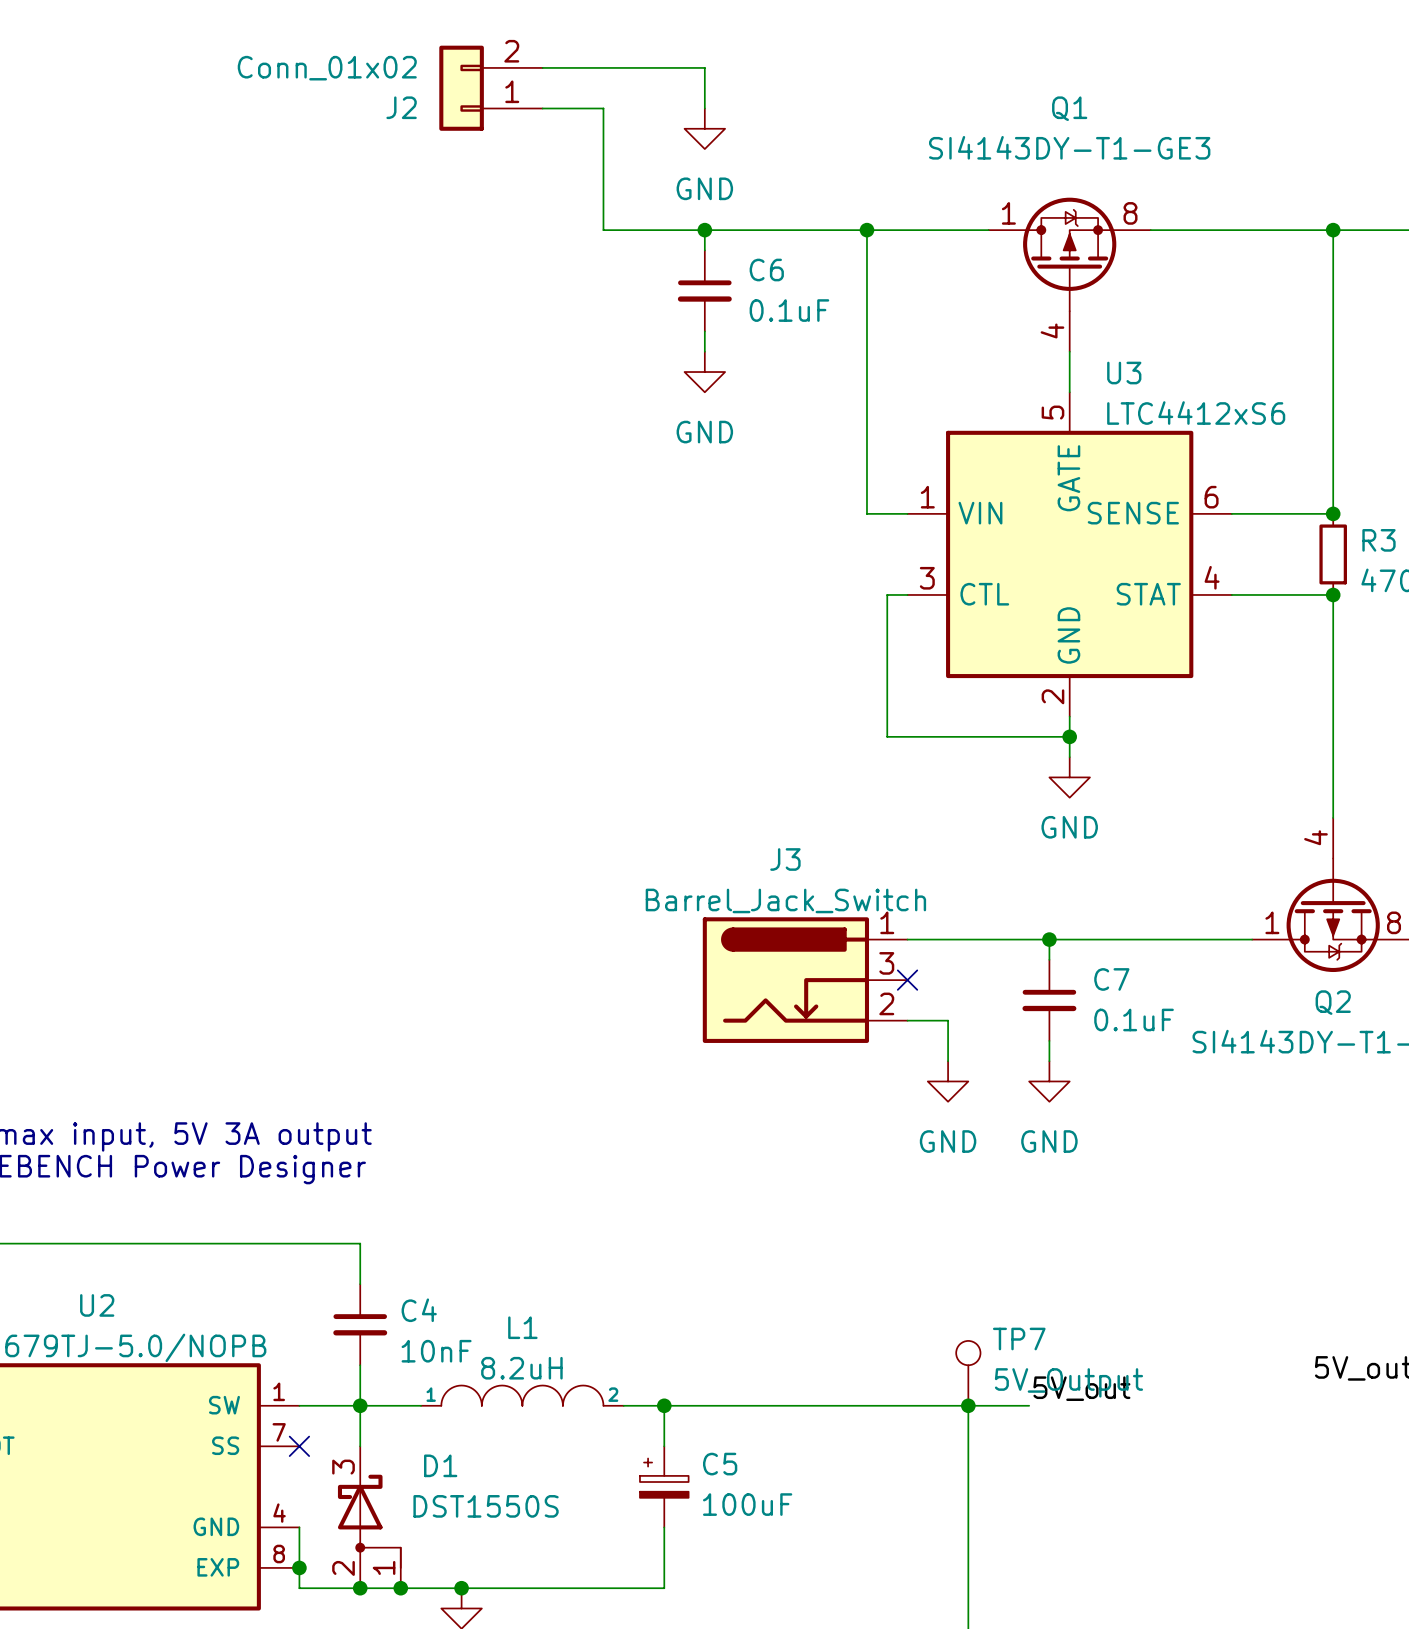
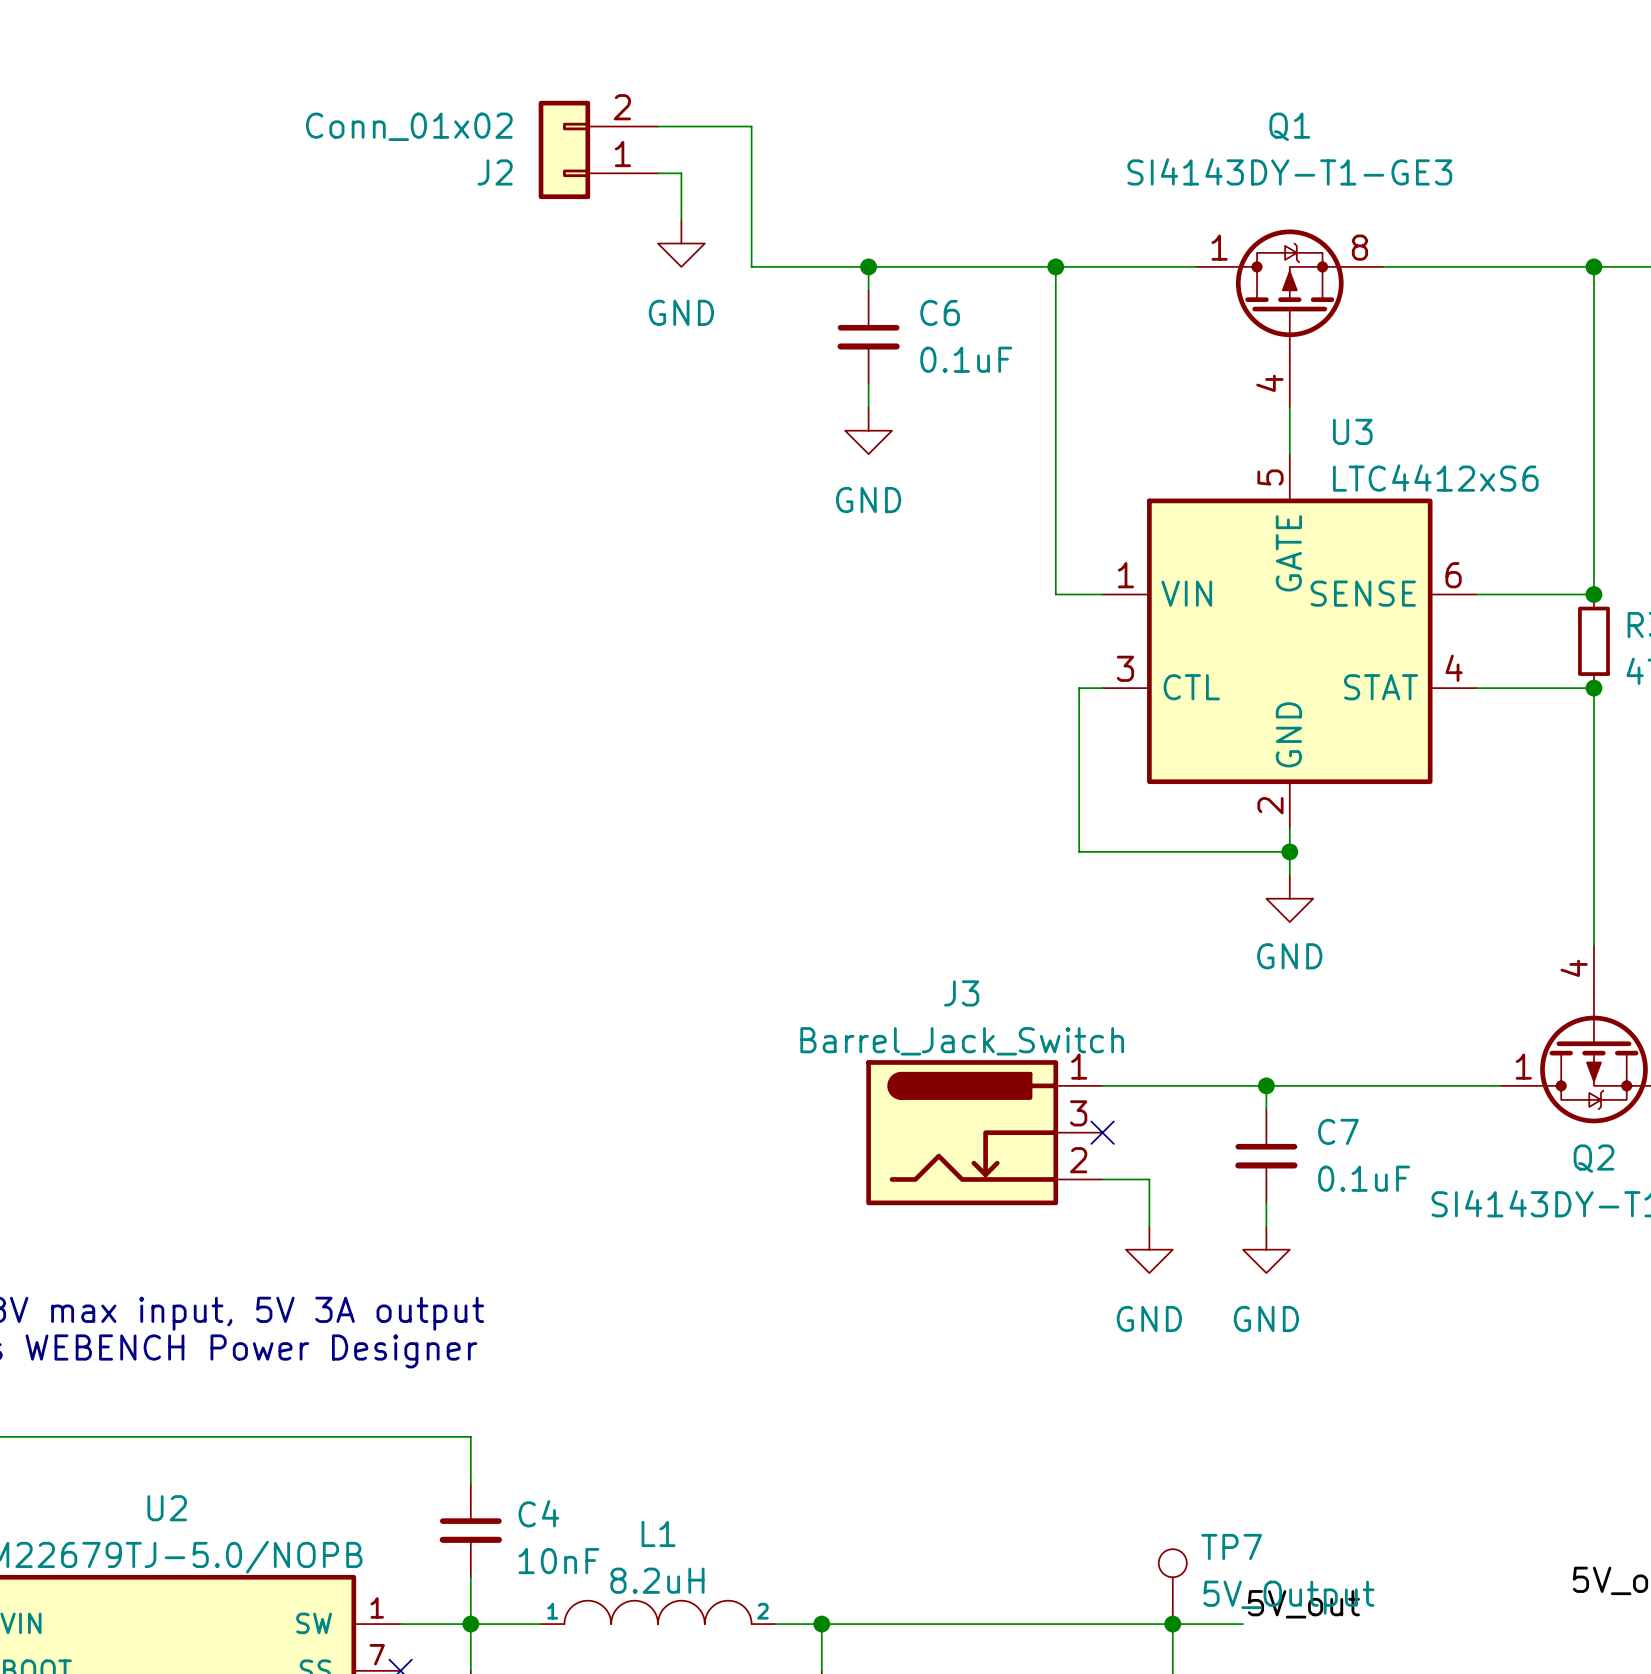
wire: (542, 67) (704, 67) (704, 108) -> none
J2 position: (490, 88) -> (598, 149)
power symbol position: GND (704, 128) -> GND (681, 243)
wire: none -> (658, 173) (681, 173) (681, 220)

